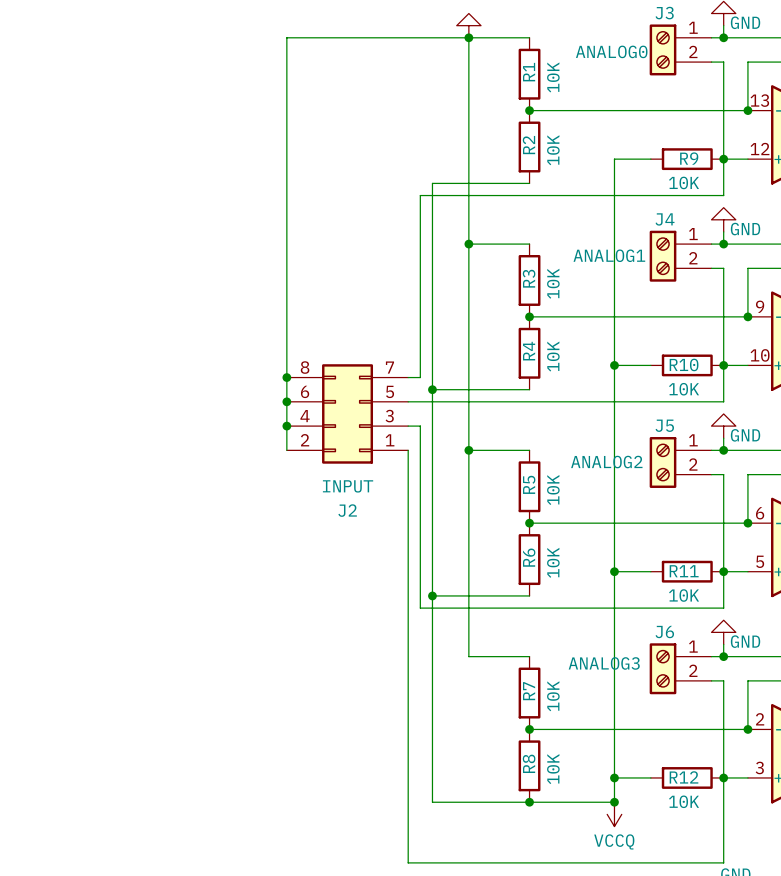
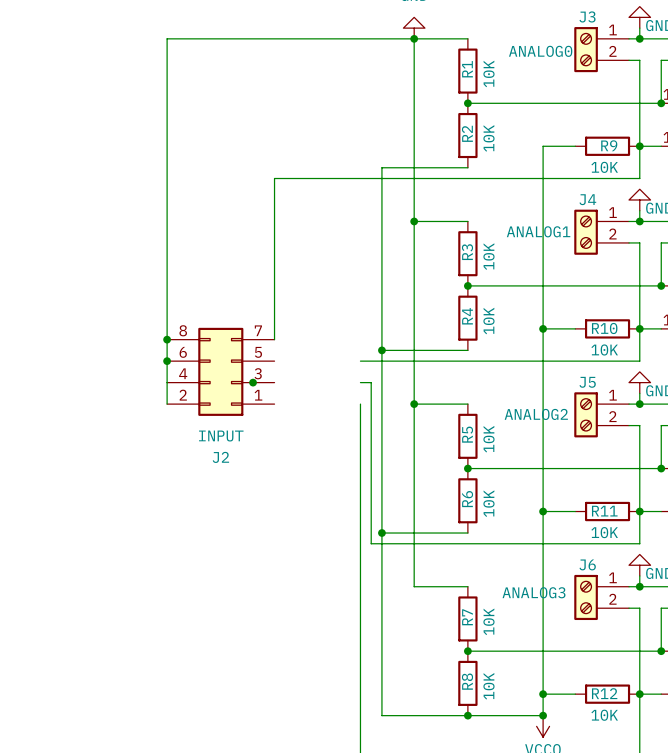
wire: (286, 37) (286, 450) -> (253, 38) (167, 38) (167, 404)
wire: (420, 195) (420, 377) (408, 377) -> (371, 178) (274, 178) (274, 339)
junction: none -> (167, 339)
junction: (286, 377) -> none
junction: none -> (167, 361)
junction: (286, 401) -> none
J2 position: (347, 413) -> (220, 371)

